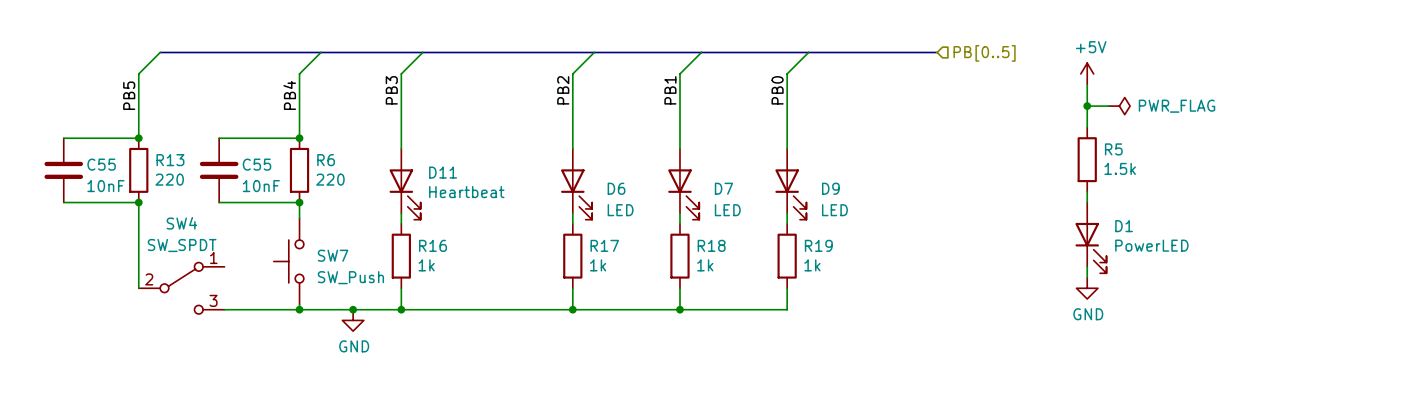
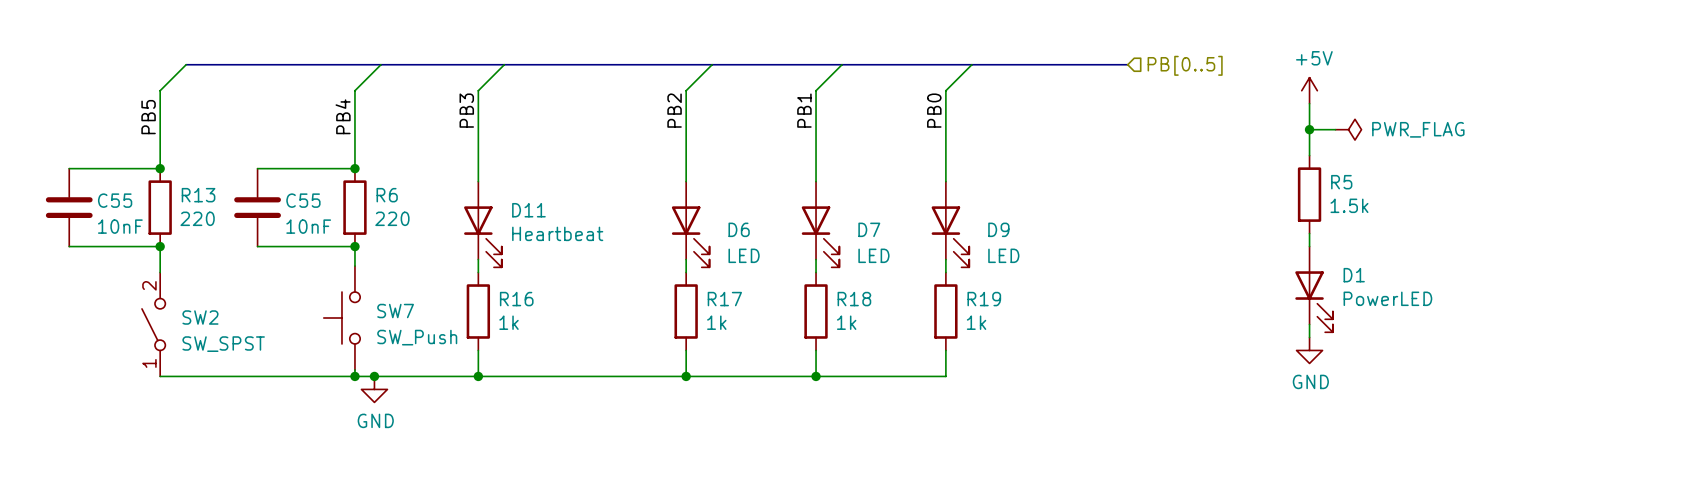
wire: (138, 223) (138, 288) -> none
SW2: none -> SW_SPST (153, 324)
SW4: SW_SPDT (181, 288) -> none
wire: none -> (160, 376) (264, 376)
junction position: (353, 309) -> (374, 376)
power symbol position: GND (353, 320) -> GND (374, 389)

